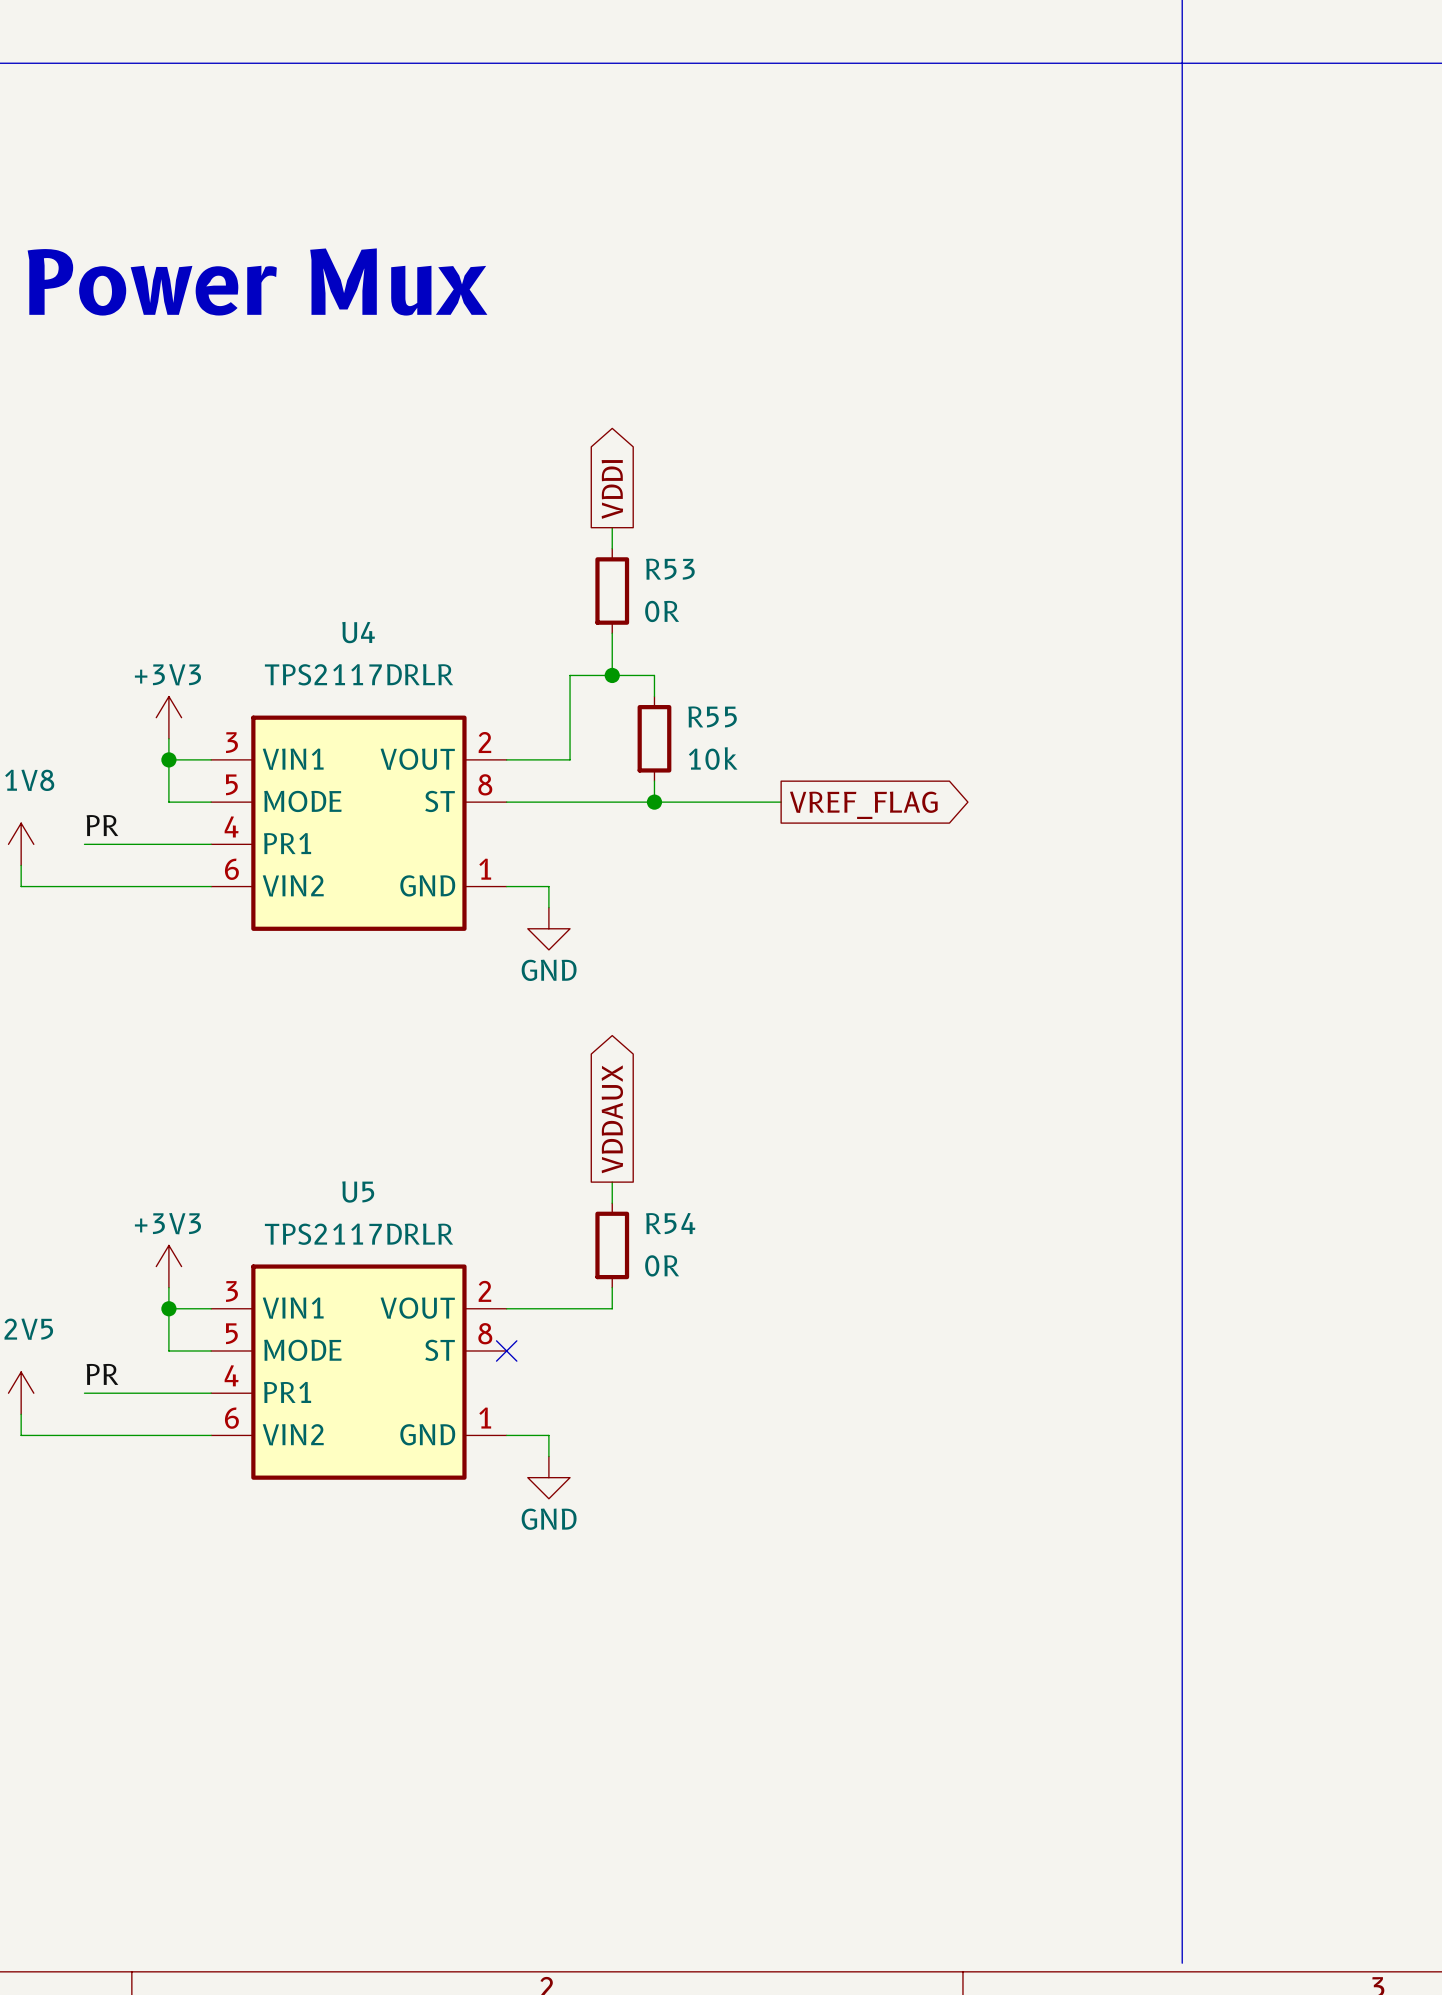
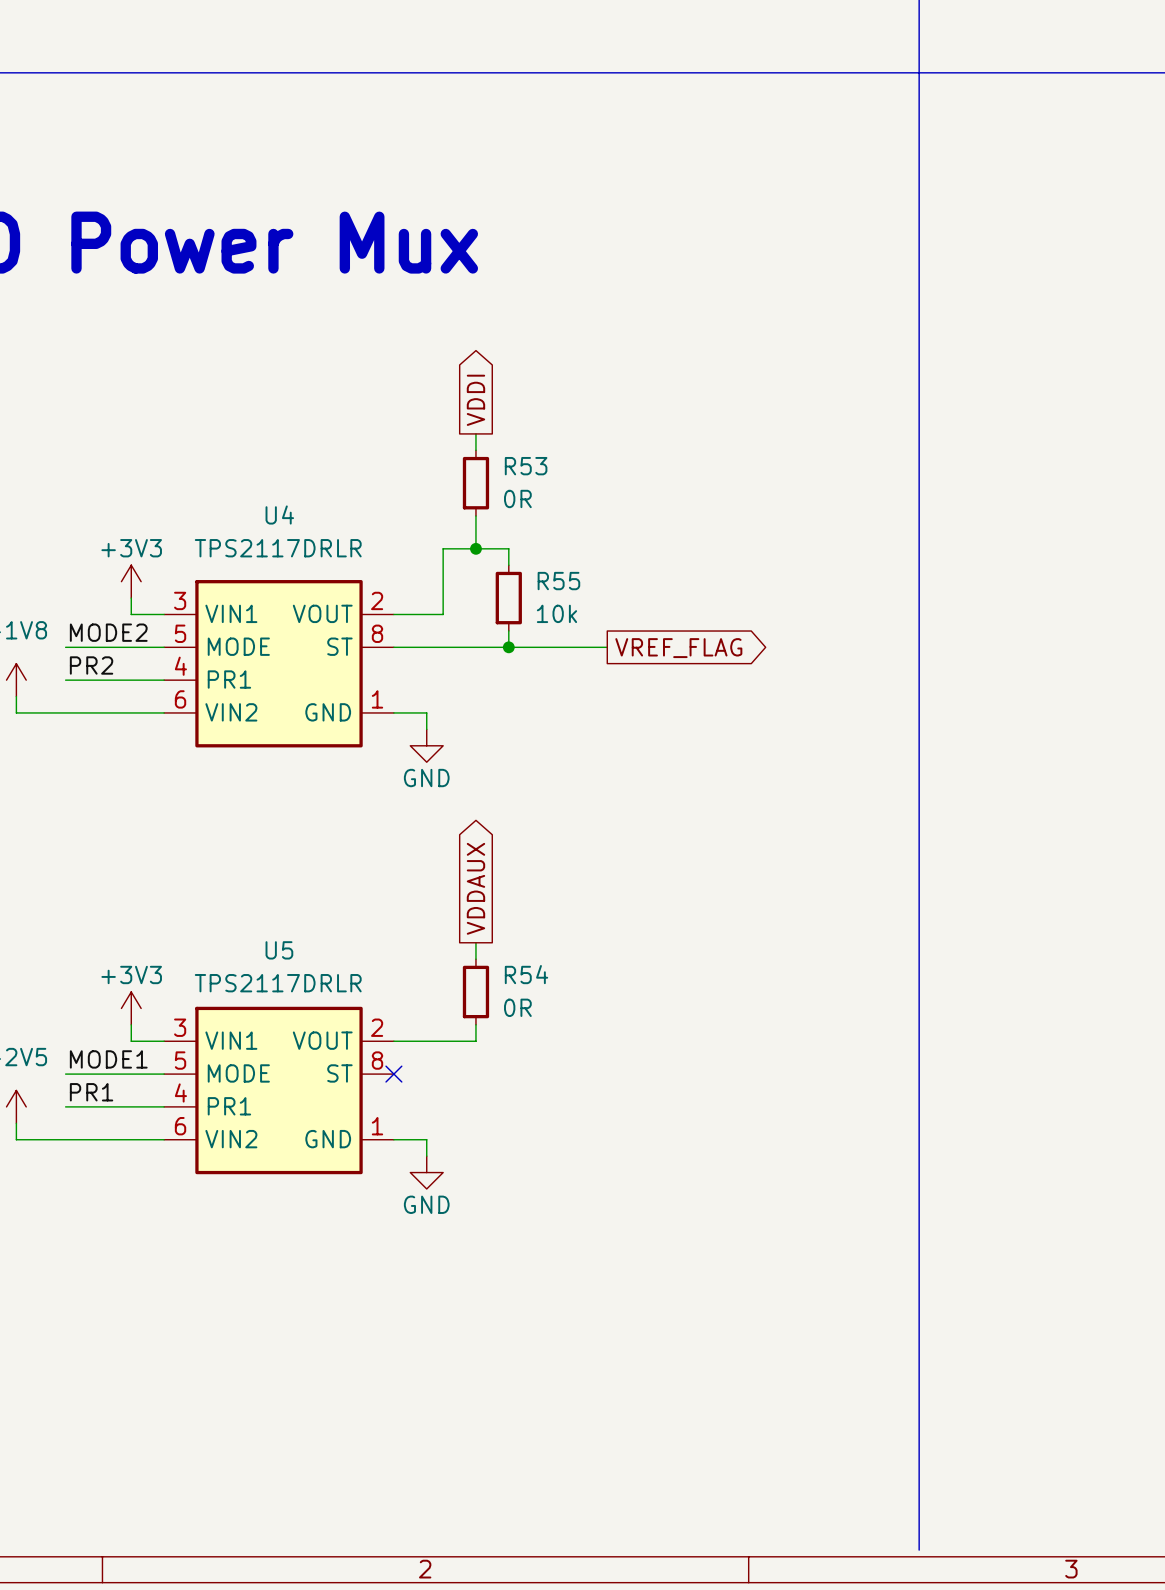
wire: (168, 759) (168, 802) -> (65, 647) (131, 647)
junction: (168, 759) -> none
label: none -> MODE2 (108, 632)
label: PR (102, 825) -> PR2 (91, 665)
wire: (168, 1308) (168, 1350) -> (65, 1074) (131, 1074)
junction: (168, 1308) -> none
label: none -> MODE1 (108, 1059)
label: PR (102, 1374) -> PR1 (91, 1092)

